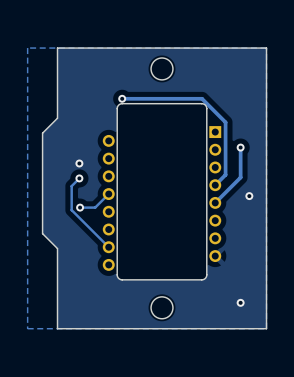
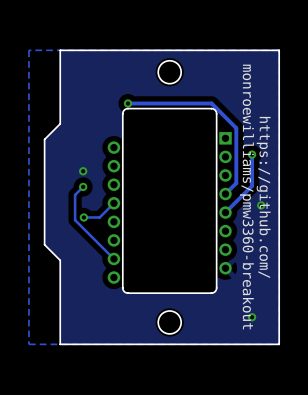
text: none -> monroewilliams/pmw3360-breakout (246, 197)
text: none -> https://github.com/ (263, 197)

